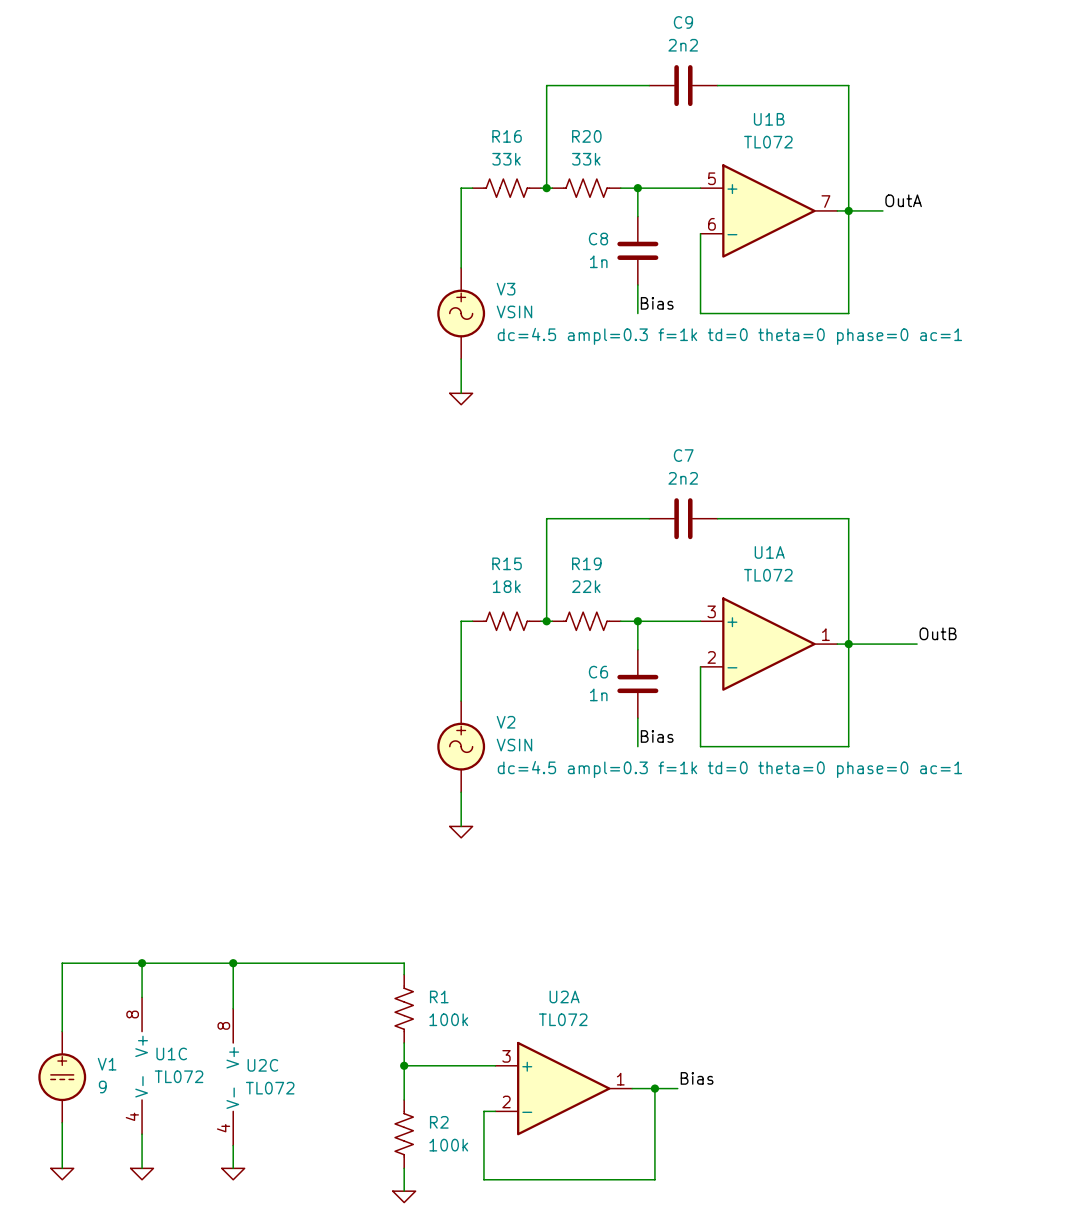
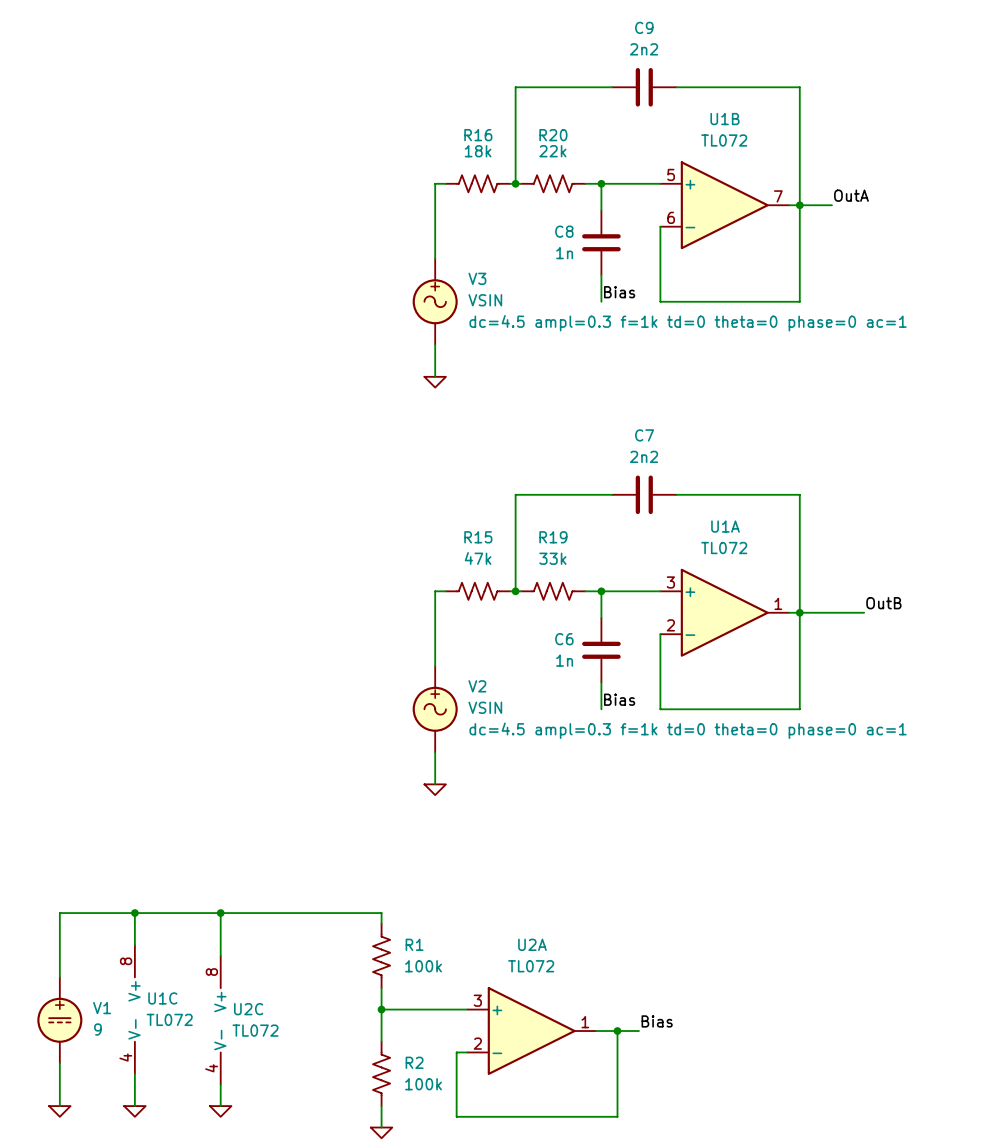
R16 value: 33k (506, 159) -> 18k (478, 151)
R20 value: 33k (586, 159) -> 22k (552, 151)
R15 value: 18k (506, 586) -> 47k (478, 558)
R19 value: 22k (586, 586) -> 33k (552, 558)

